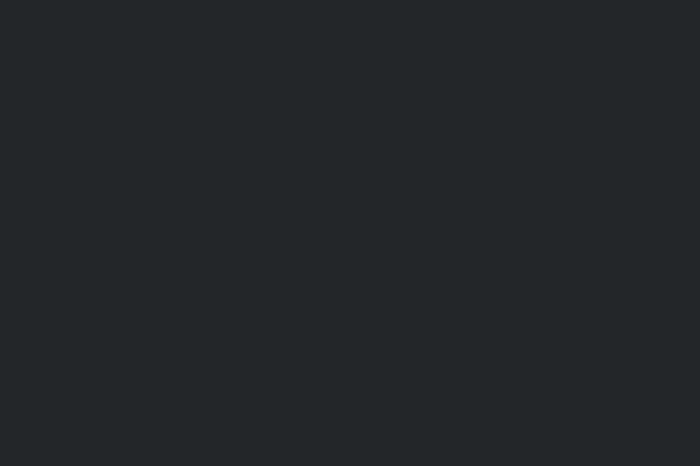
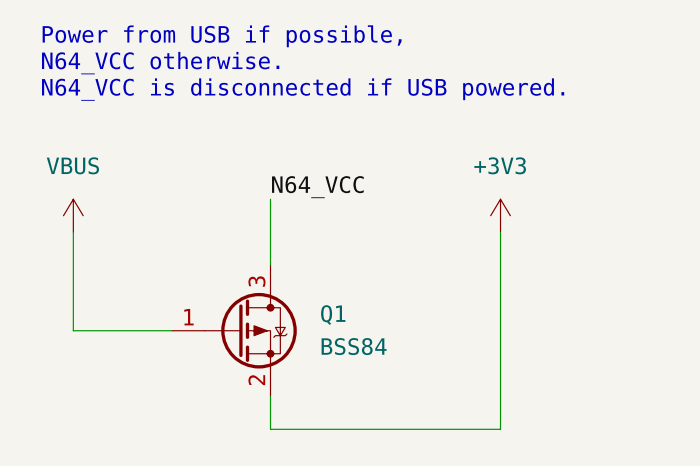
text: none -> Power from USB if possible, (222, 36)
text: none -> N64_VCC otherwise. (160, 63)
text: none -> N64_VCC is disconnected if USB powered. (303, 89)
label: none -> N64_VCC (317, 187)
wire: none -> (270, 199) (270, 265)
power symbol: none -> VBUS (73, 215)
power symbol: none -> +3V3 (500, 215)
wire: none -> (73, 232) (73, 330) (171, 330)
wire: none -> (500, 232) (500, 429) (270, 429) (270, 396)
Q1: none -> BSS84 (234, 330)

